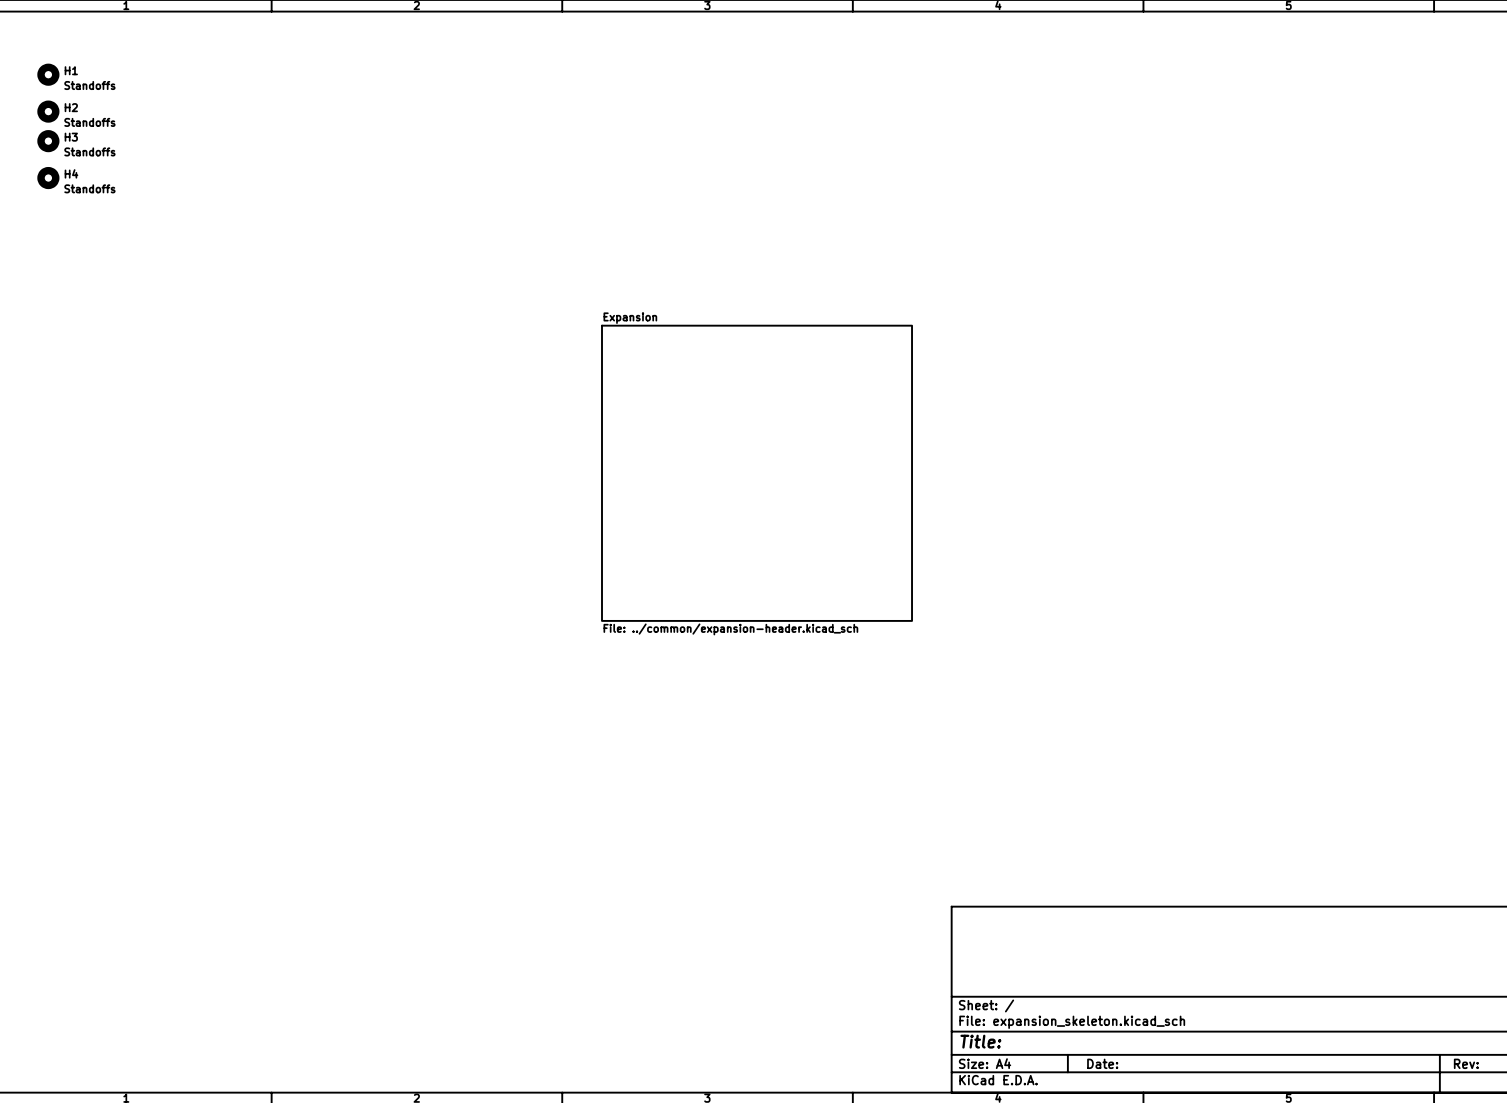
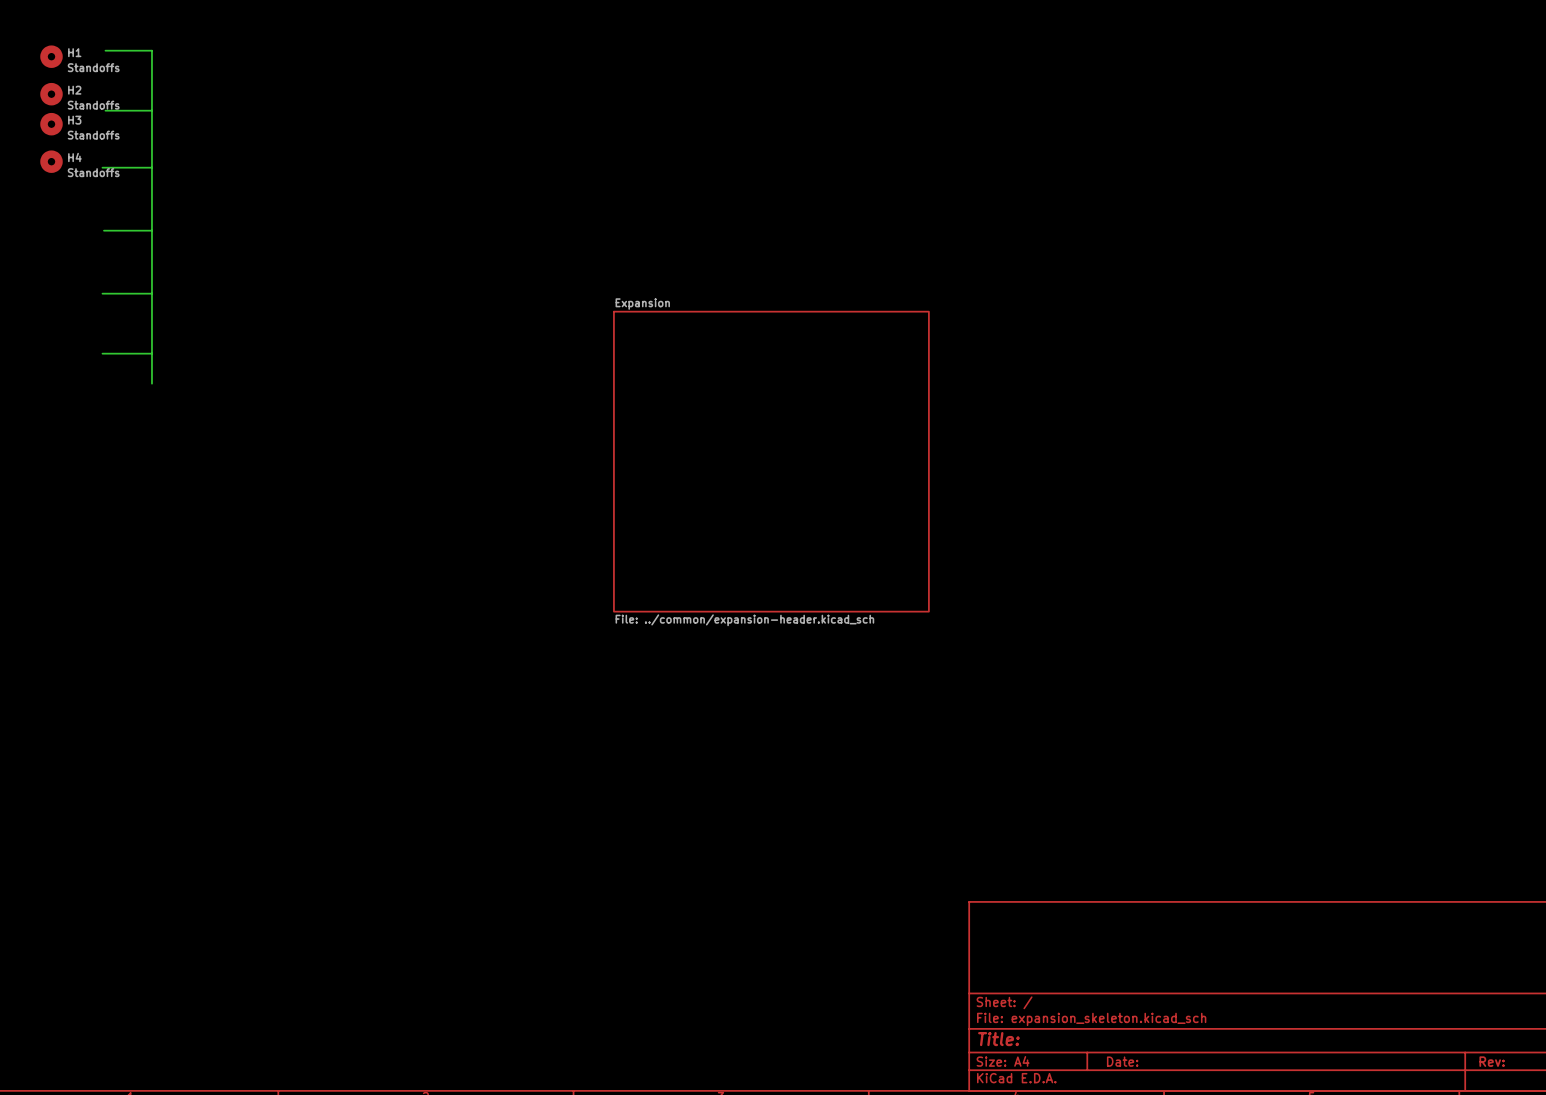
wire: none -> (105, 50) (151, 50) (151, 383)
wire: none -> (105, 110) (151, 110)
wire: none -> (102, 167) (151, 167)
wire: none -> (103, 230) (151, 230)
wire: none -> (102, 293) (151, 293)
wire: none -> (102, 353) (151, 353)

